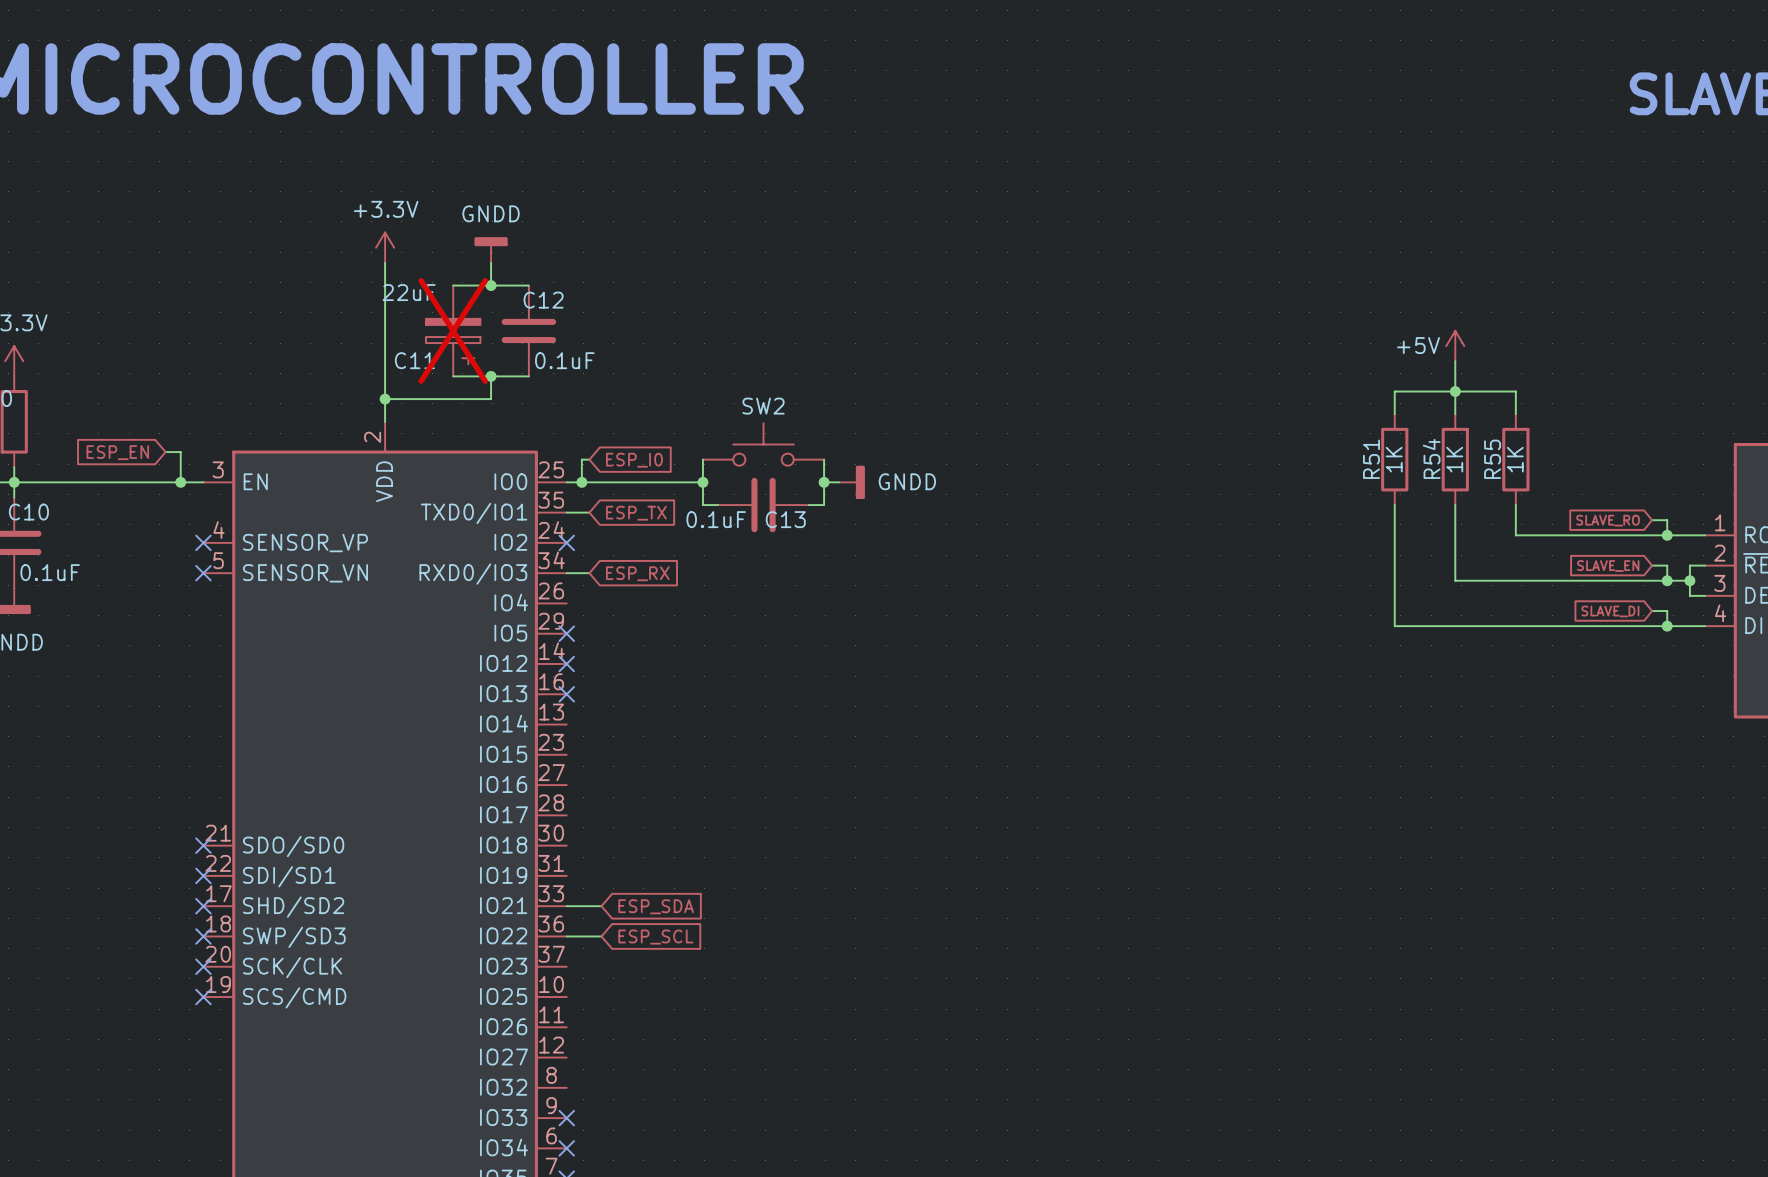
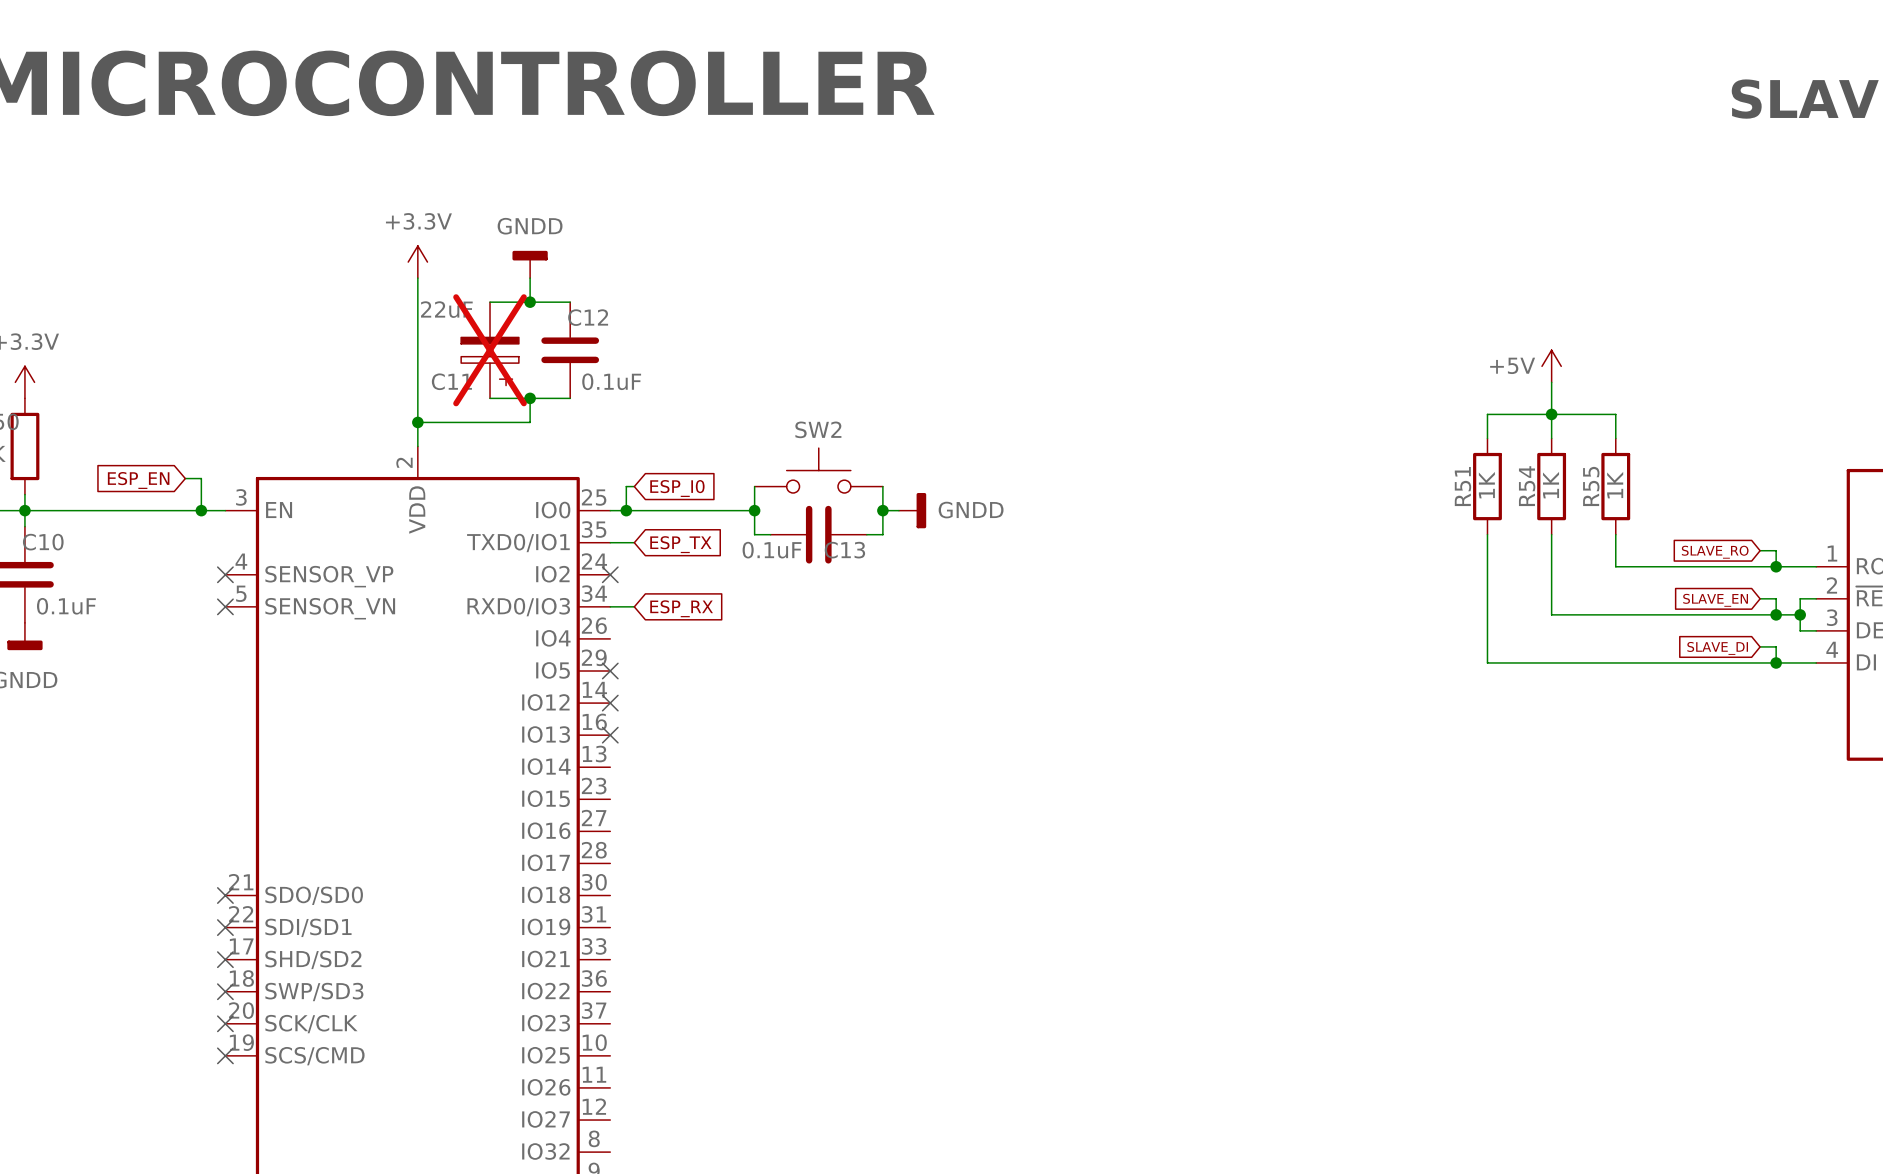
wire: (566, 906) (601, 906) -> none
global label: ESP_SDA (656, 906) -> none
wire: (566, 936) (601, 936) -> none
global label: ESP_SCL (655, 937) -> none

